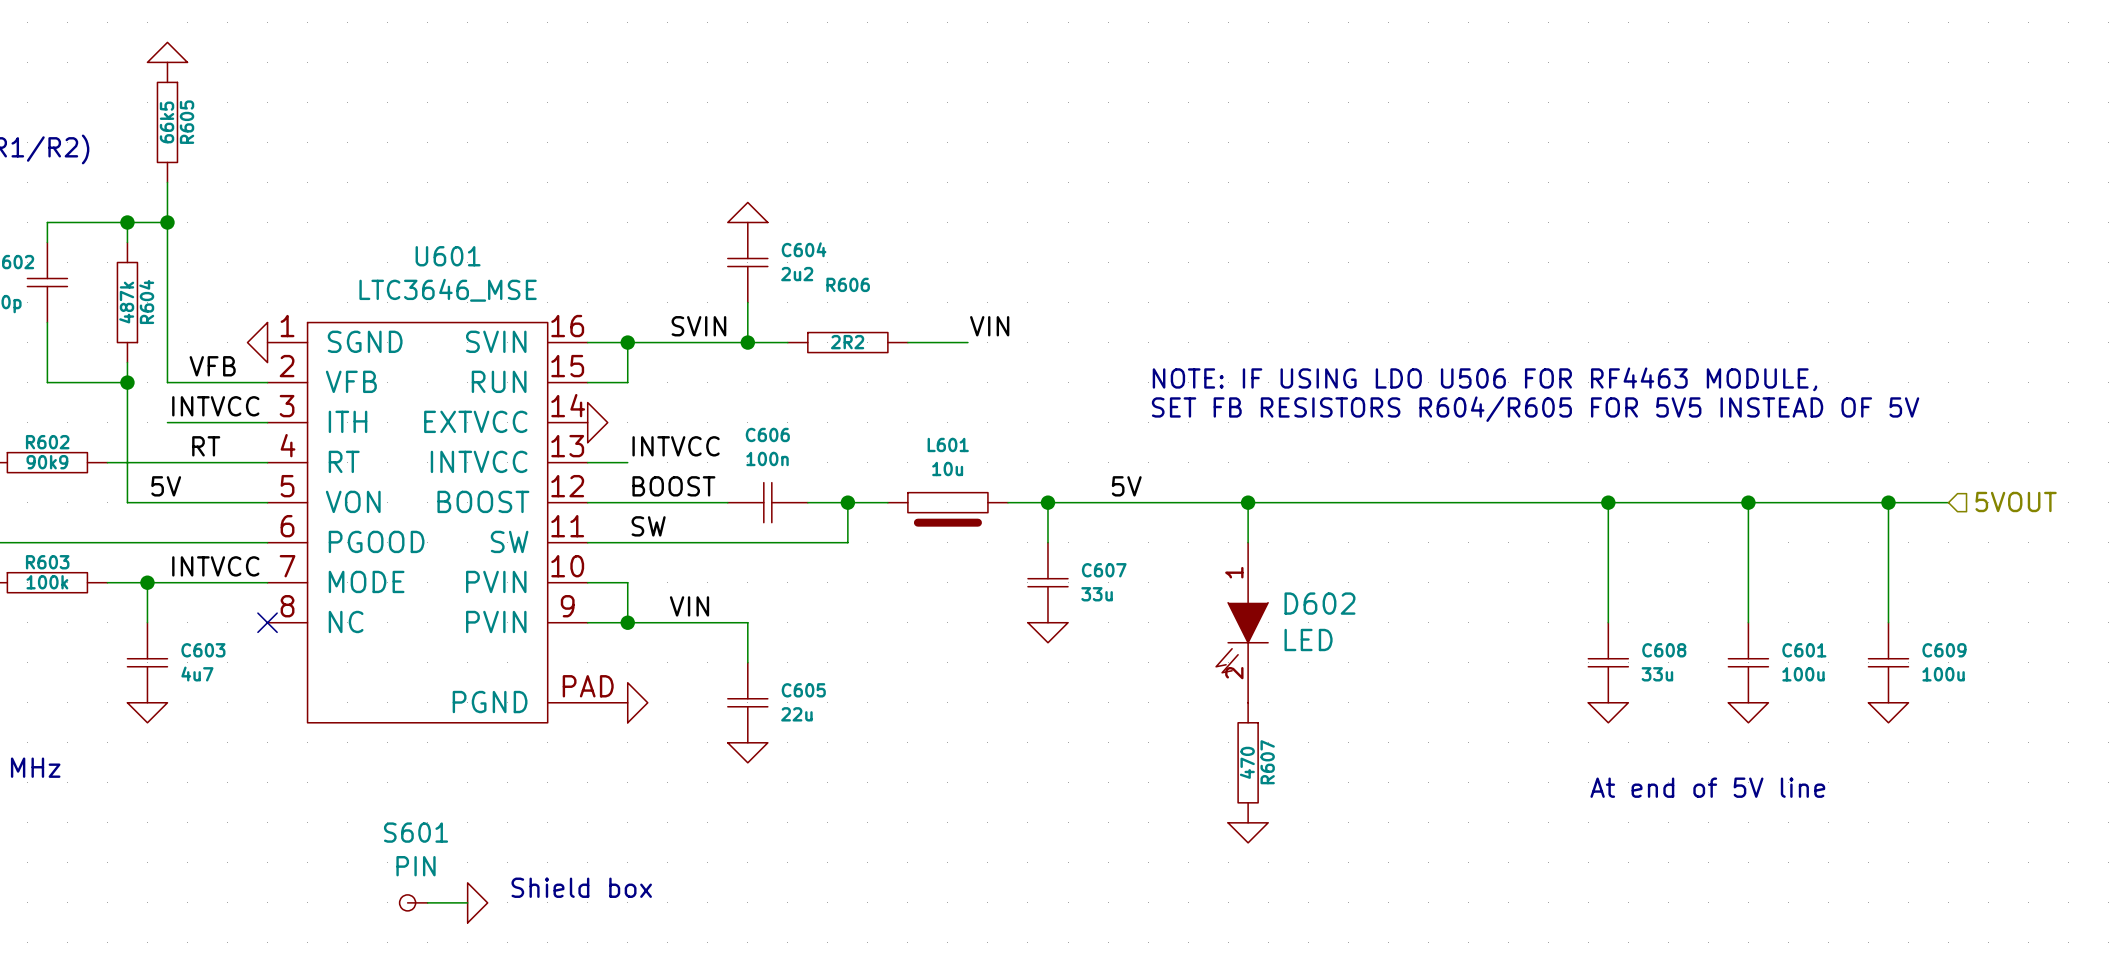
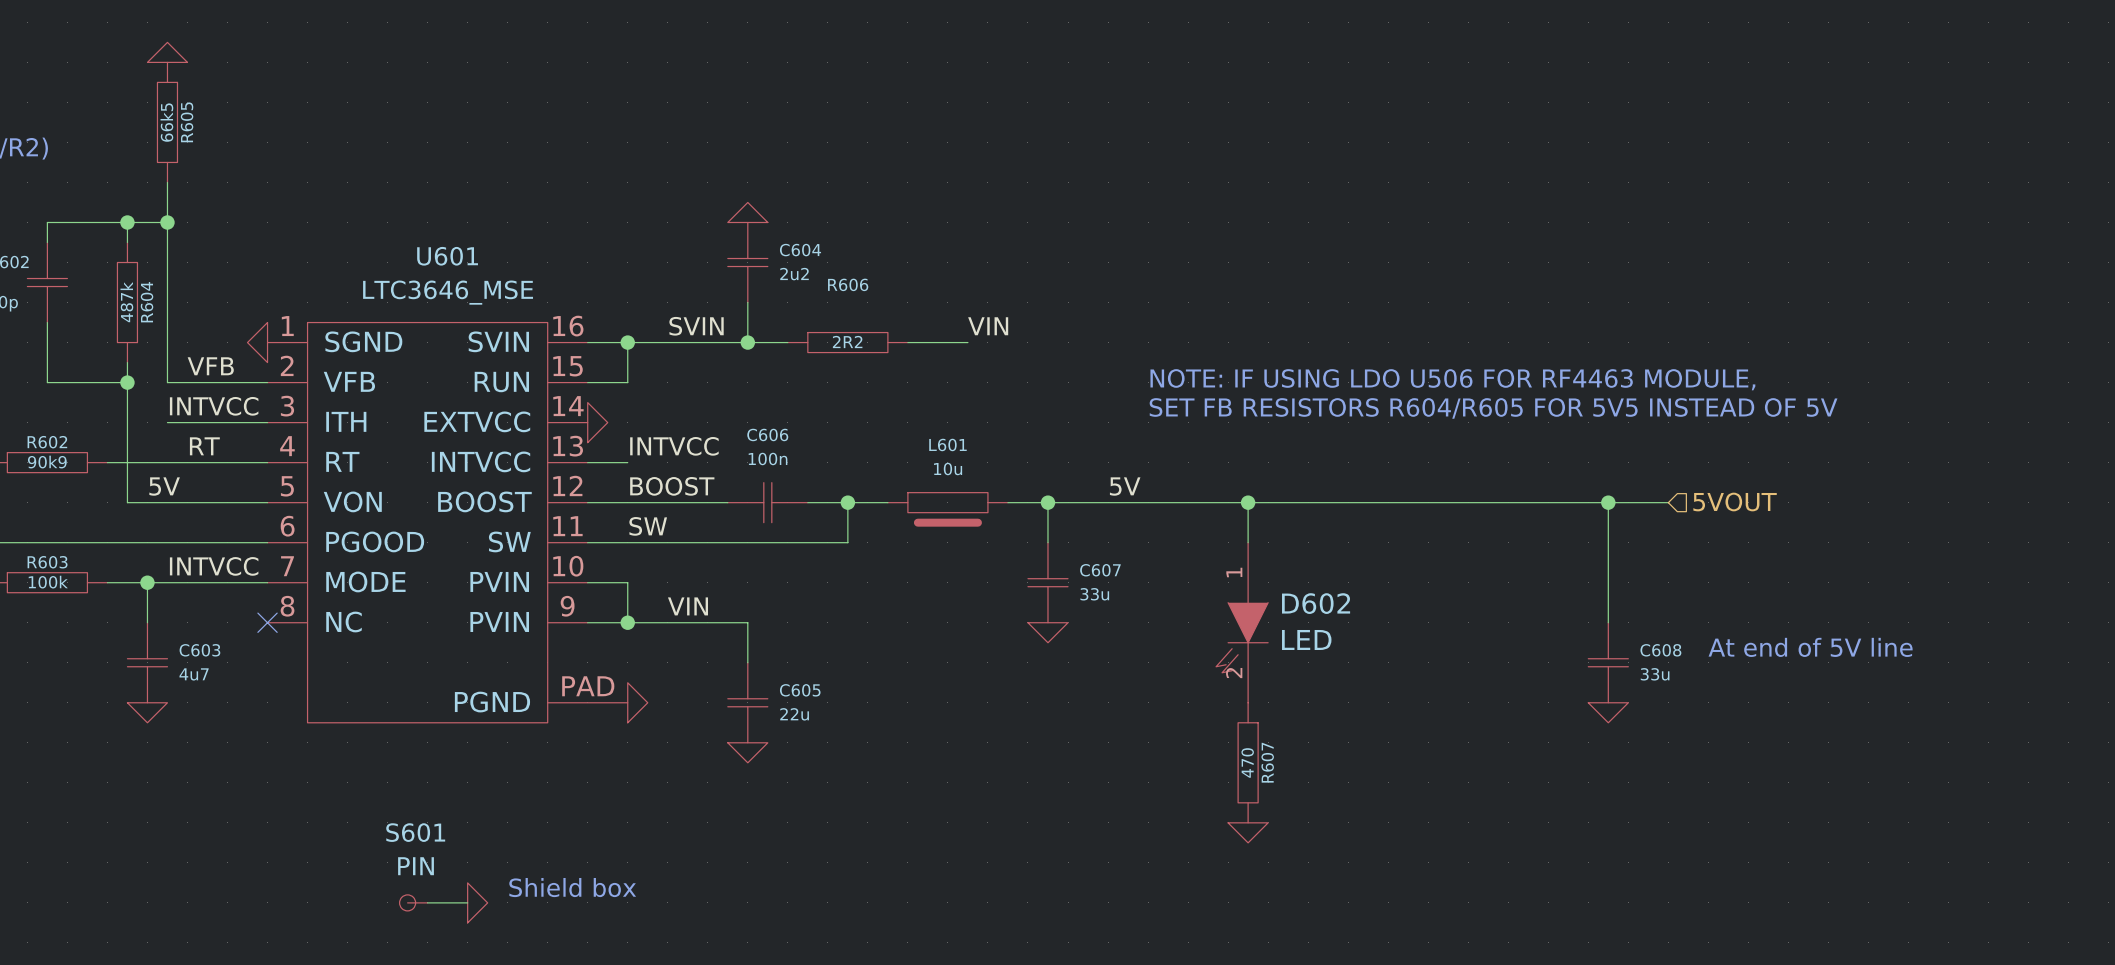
hierarchical label position: 5VOUT (2016, 501) -> 5VOUT (1735, 502)
wire: (1668, 502) (1948, 502) -> none
wire: (1748, 502) (1748, 622) -> none
junction: (1748, 502) -> none
wire: (1888, 502) (1888, 622) -> none
junction: (1888, 502) -> none
C601: 100u (1748, 662) -> none
C609: 100u (1888, 662) -> none
power symbol: (1748, 712) -> none
power symbol: (1888, 712) -> none
text position: At end of 5V line (1707, 787) -> At end of 5V line (1810, 647)

